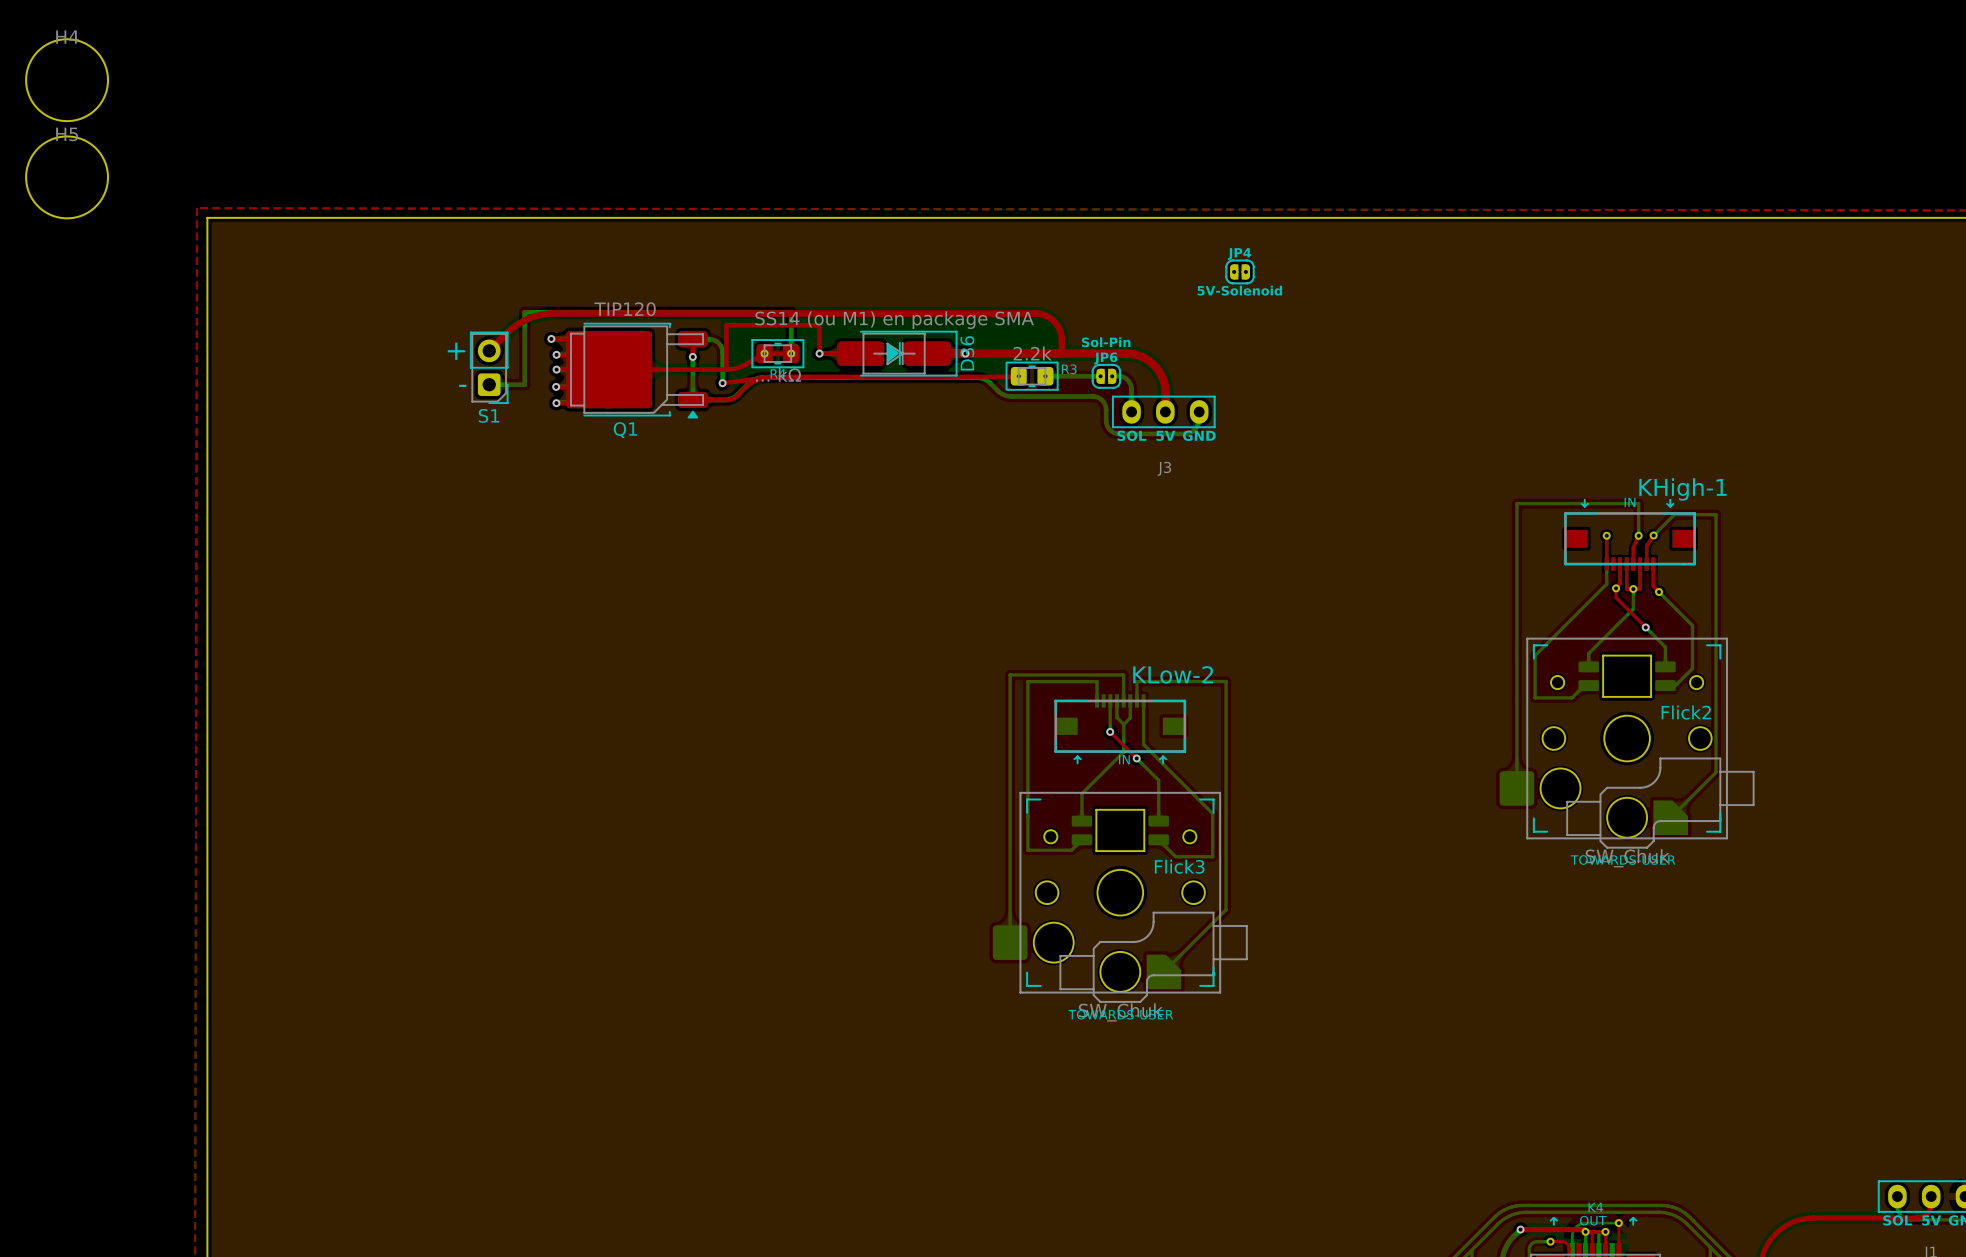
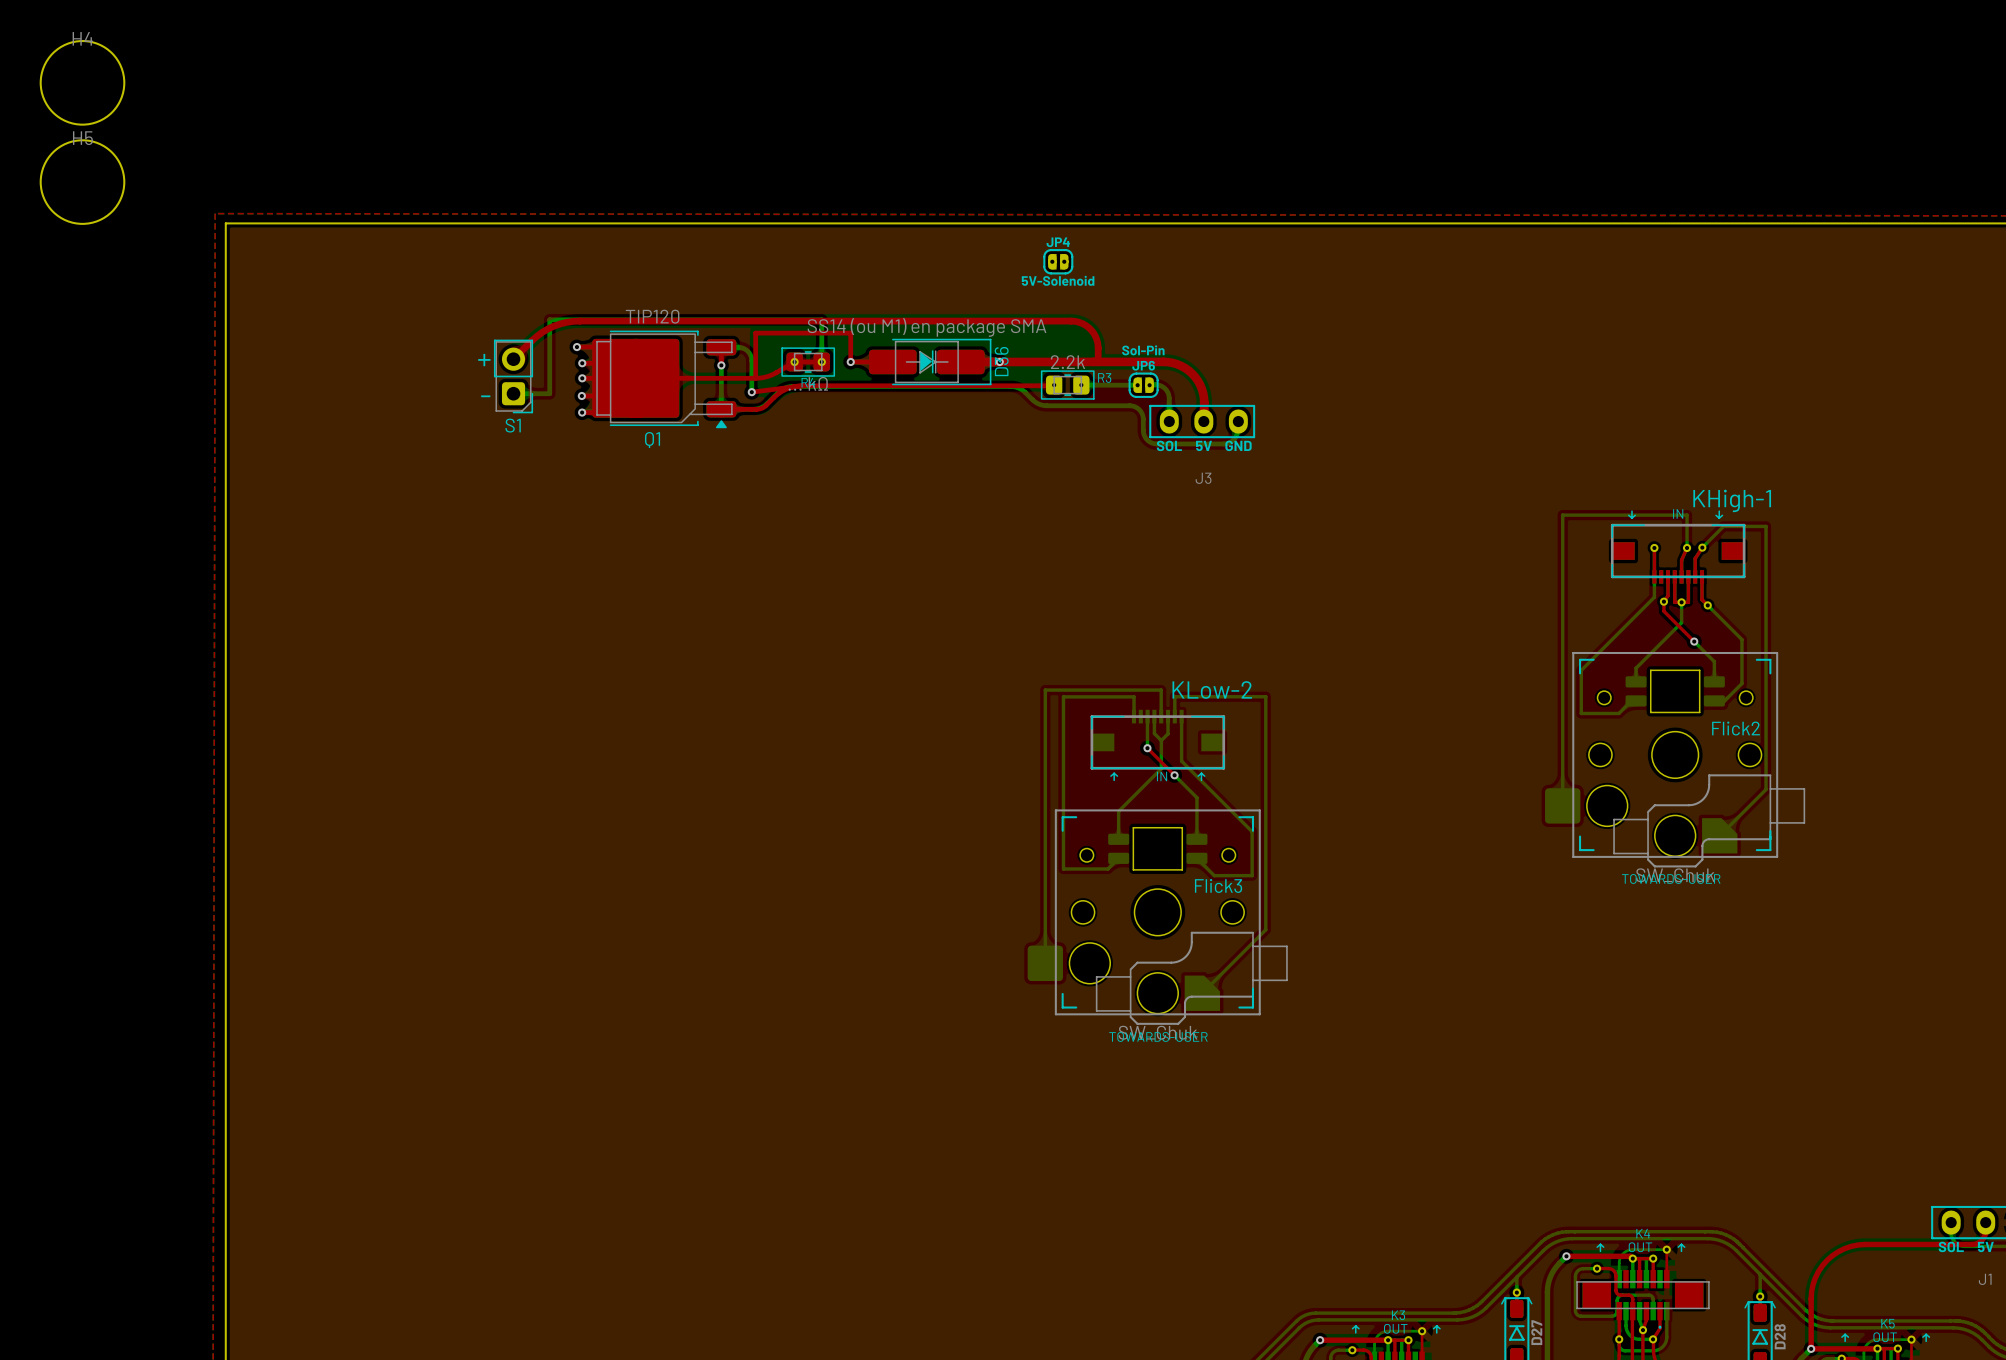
JP4 position: (1240, 271) -> (1058, 261)

